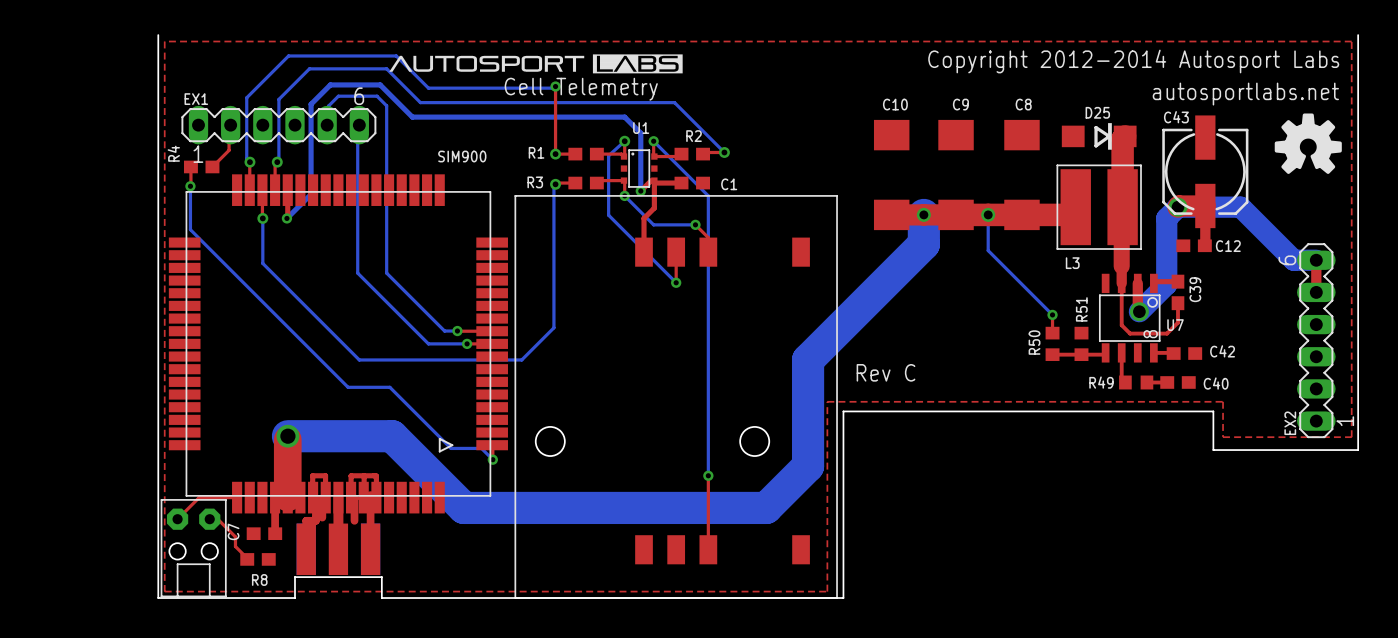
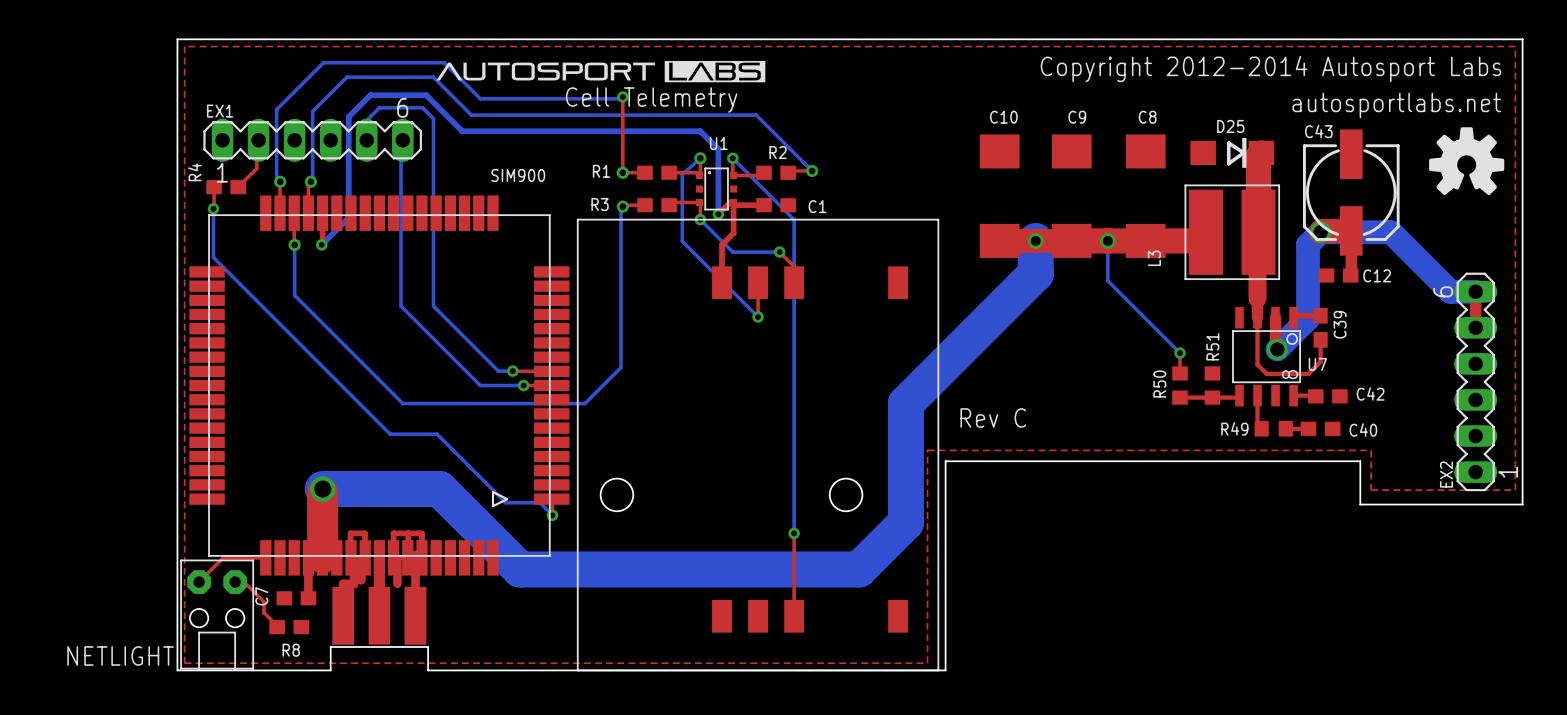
board edge: none -> (177, 39) (1522, 39)
L3 name rotation: 0° (1072, 263) -> 90° counterclockwise (1154, 258)
L3 name position: L3 (1072, 263) -> L3 (1154, 258)
NETLIGHT name: none -> NETLIGHT (120, 656)

